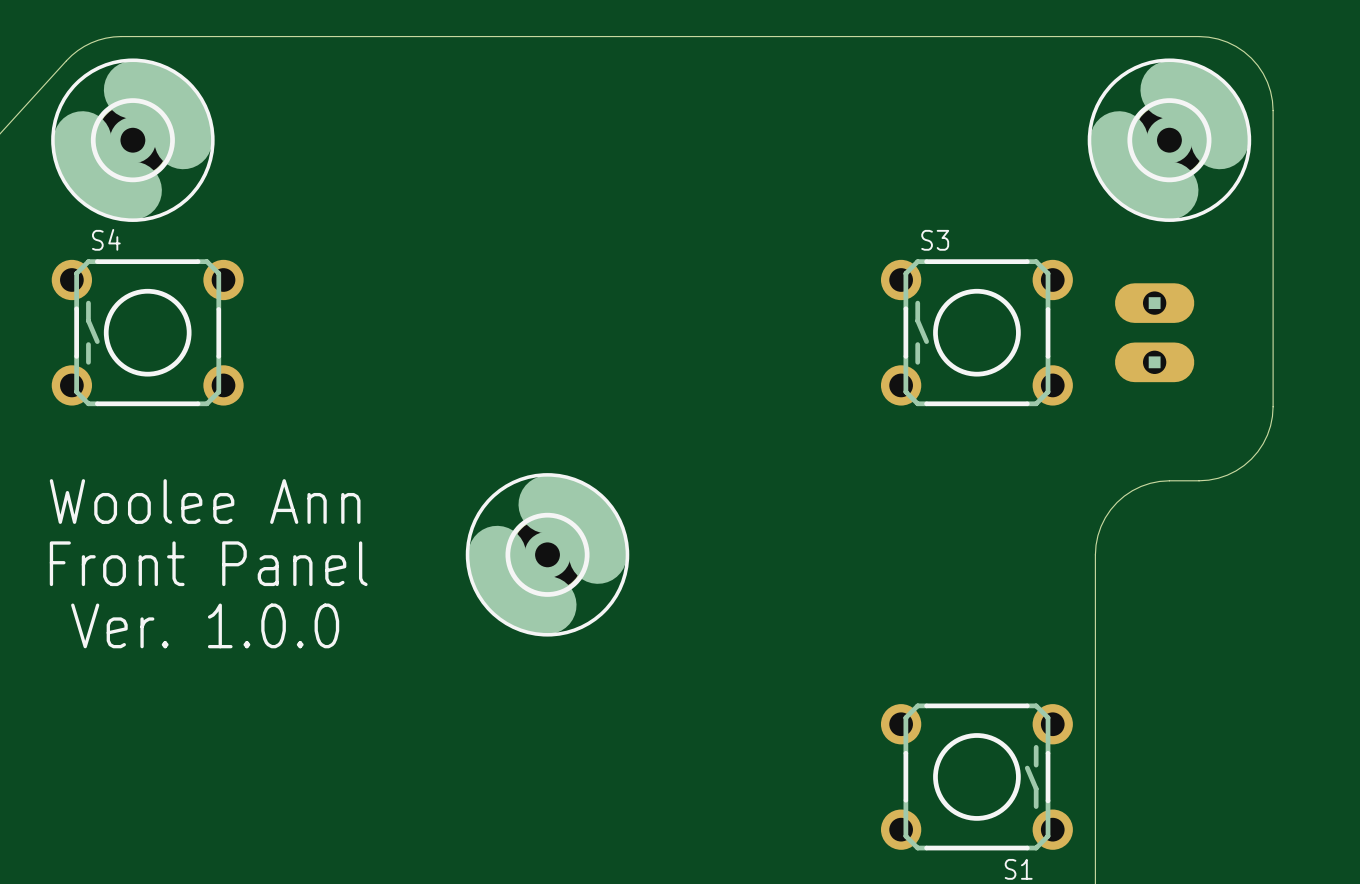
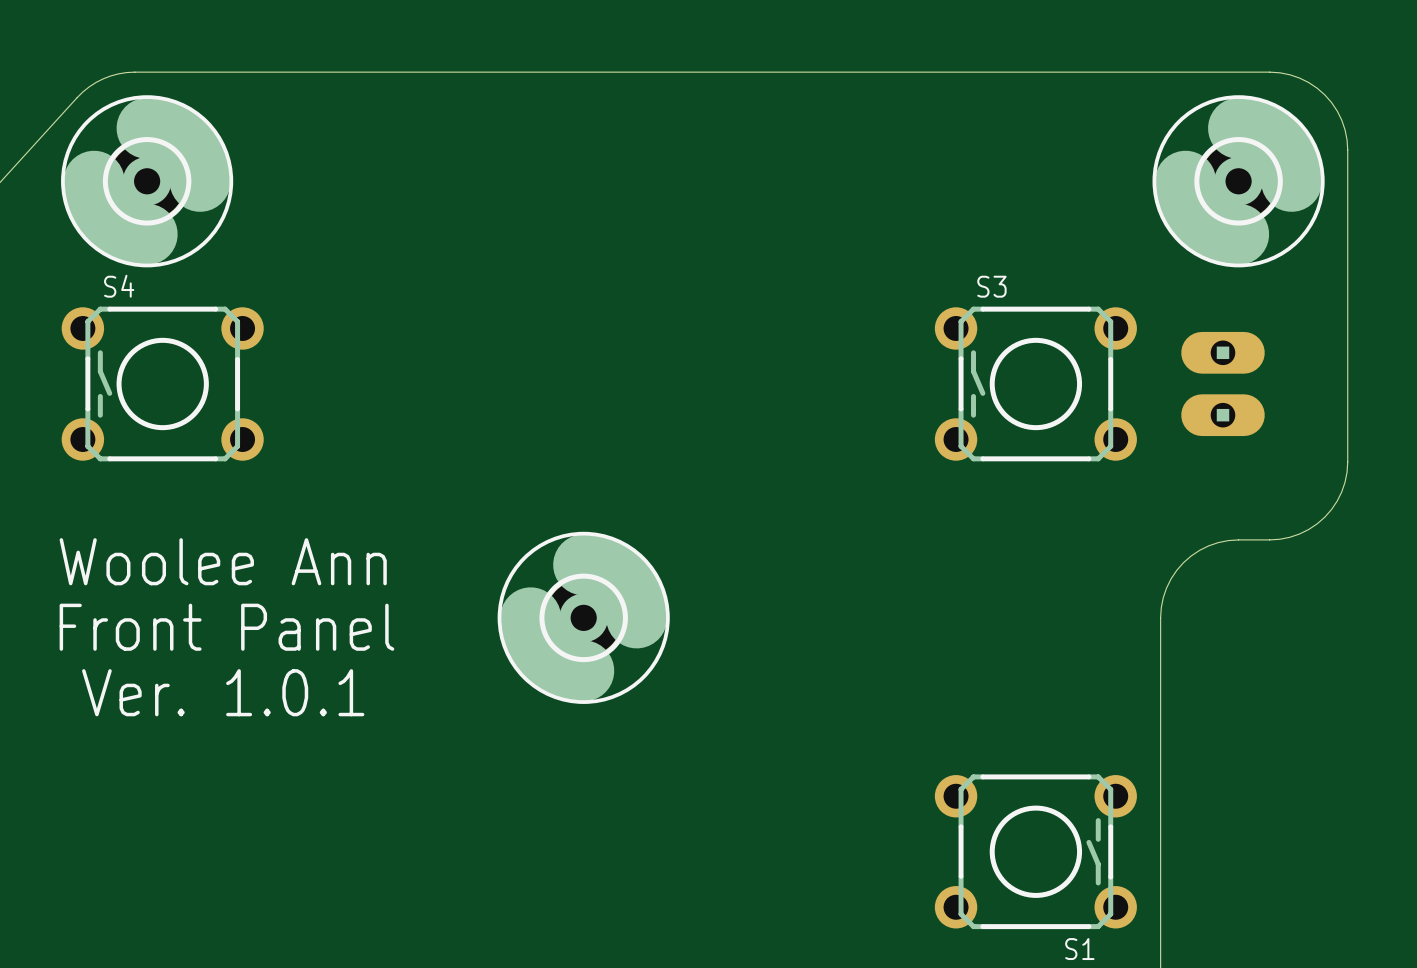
text: Ver. 1.0.0 (205, 625) -> Ver. 1.0.1 (223, 692)

